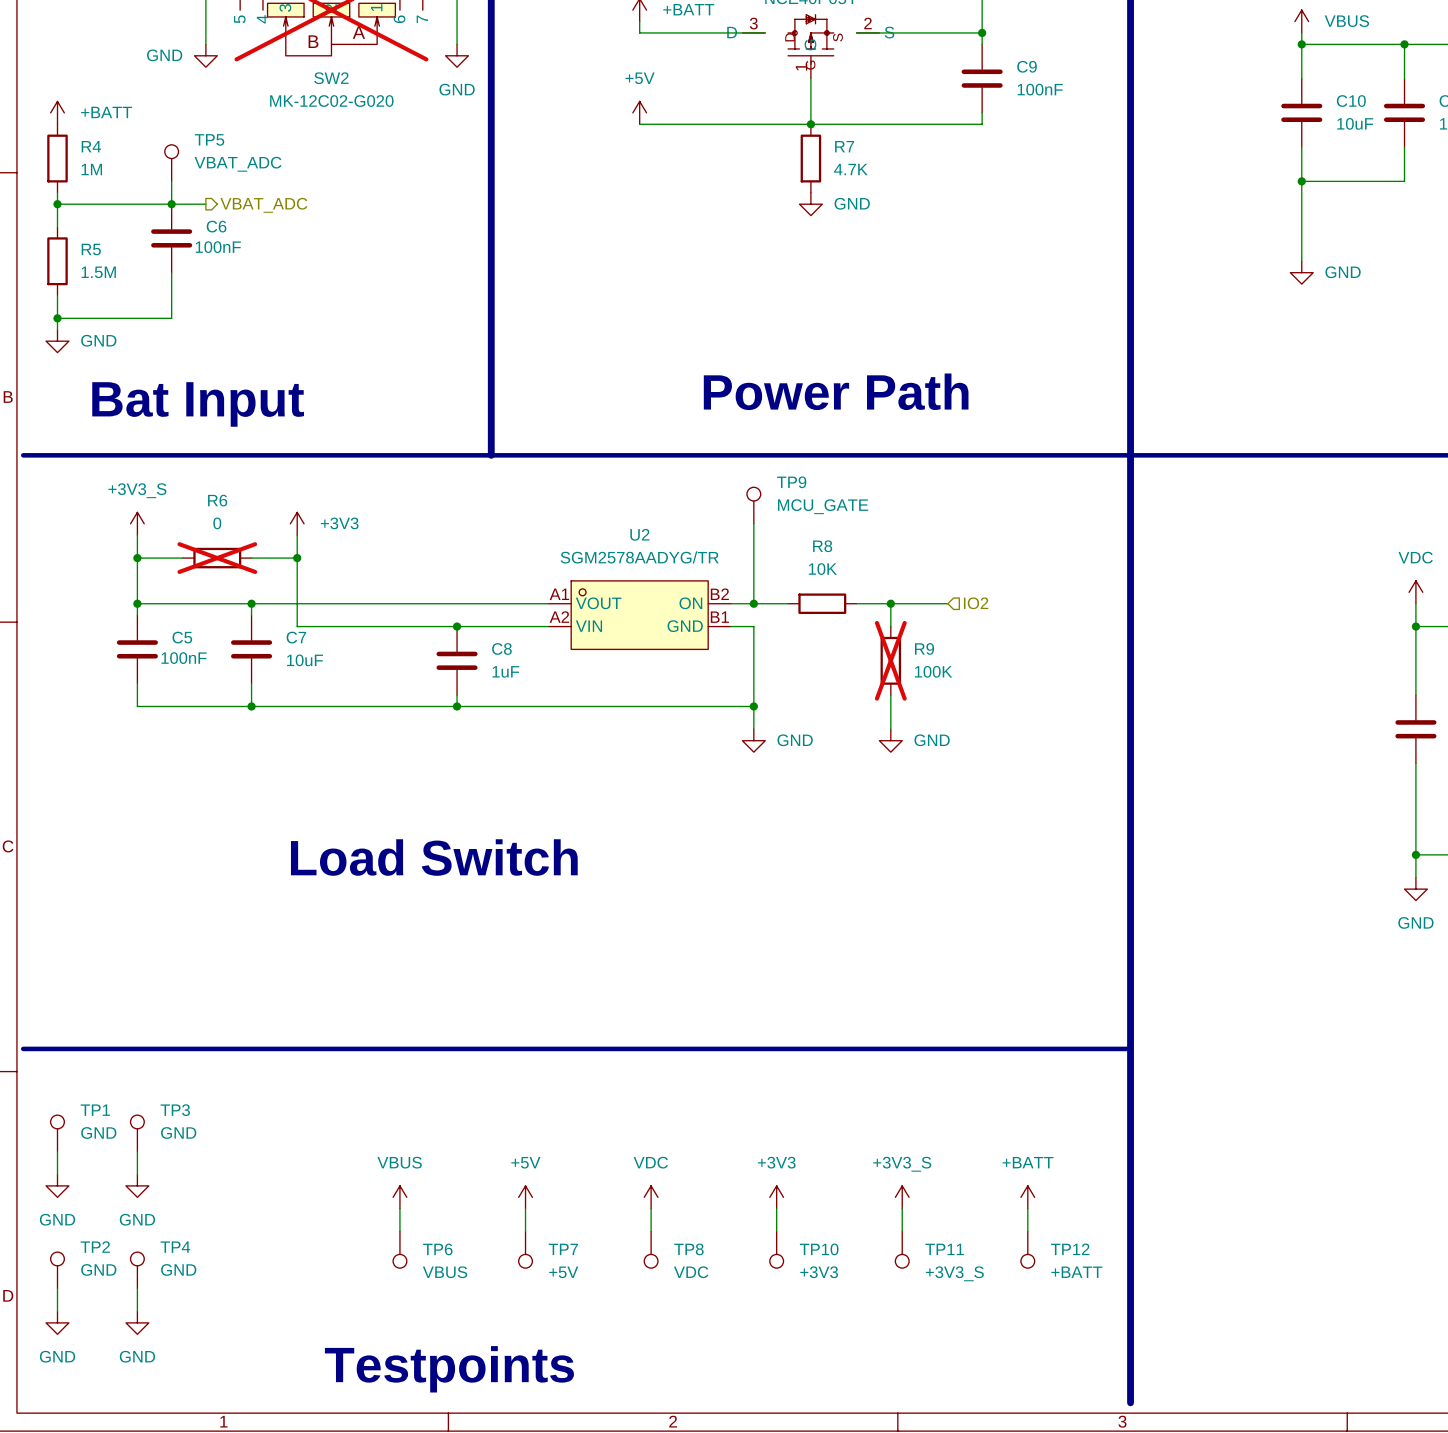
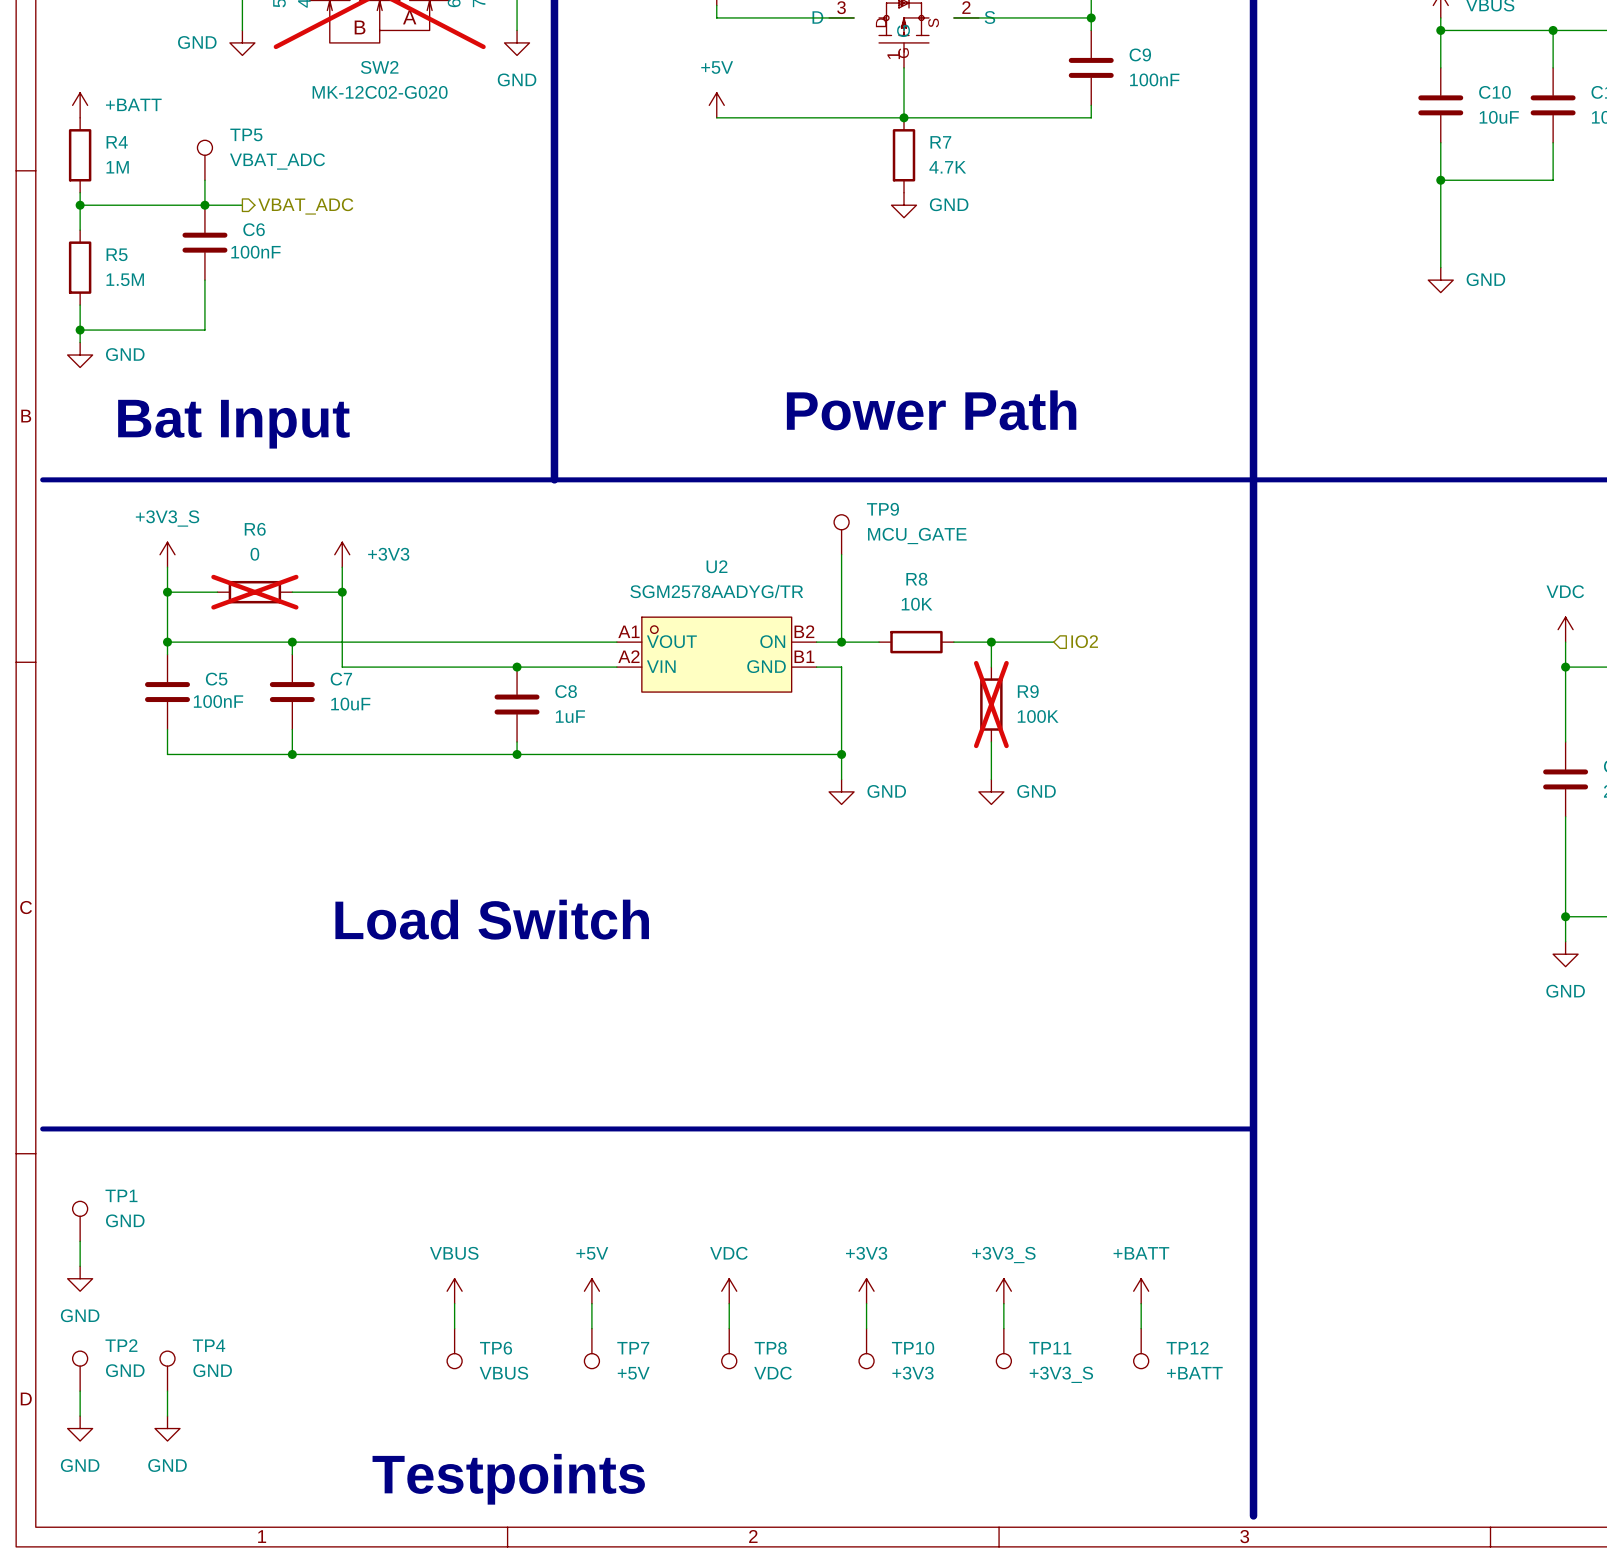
TP3: GND (137, 1133) -> none
wire: (137, 1151) (137, 1174) -> none
power symbol: GND (137, 1185) -> none

